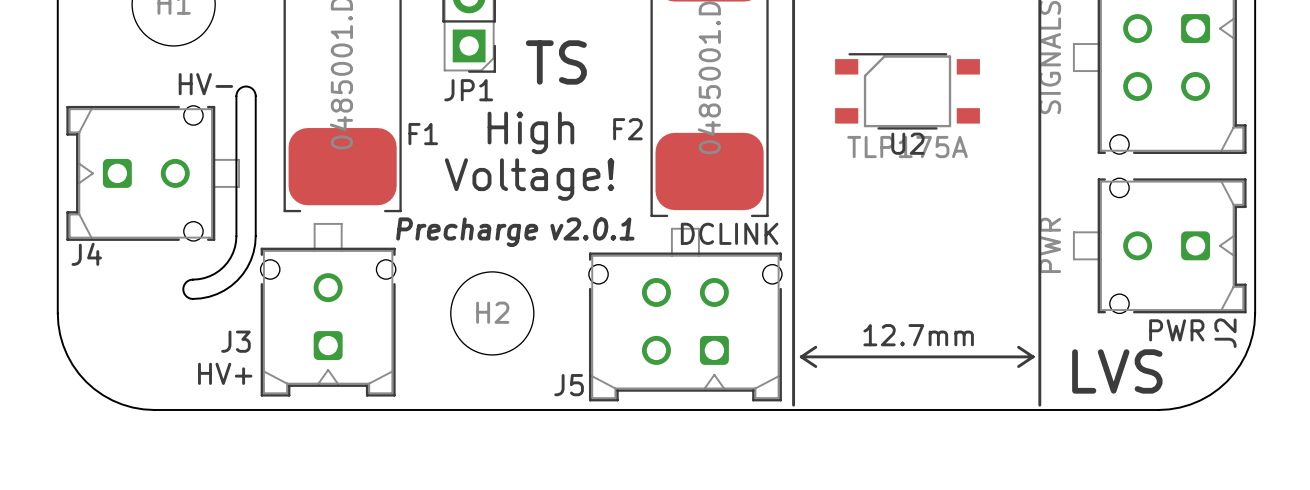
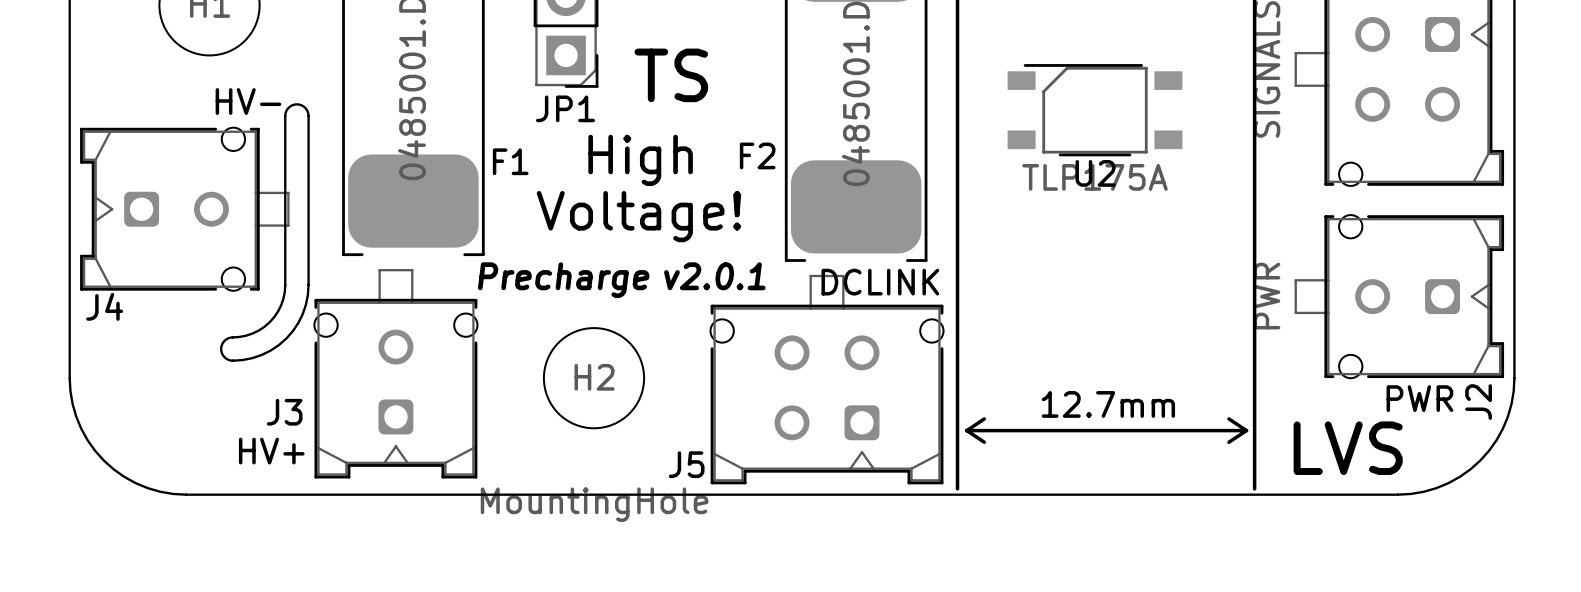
H2 value: none -> MountingHole (594, 504)

